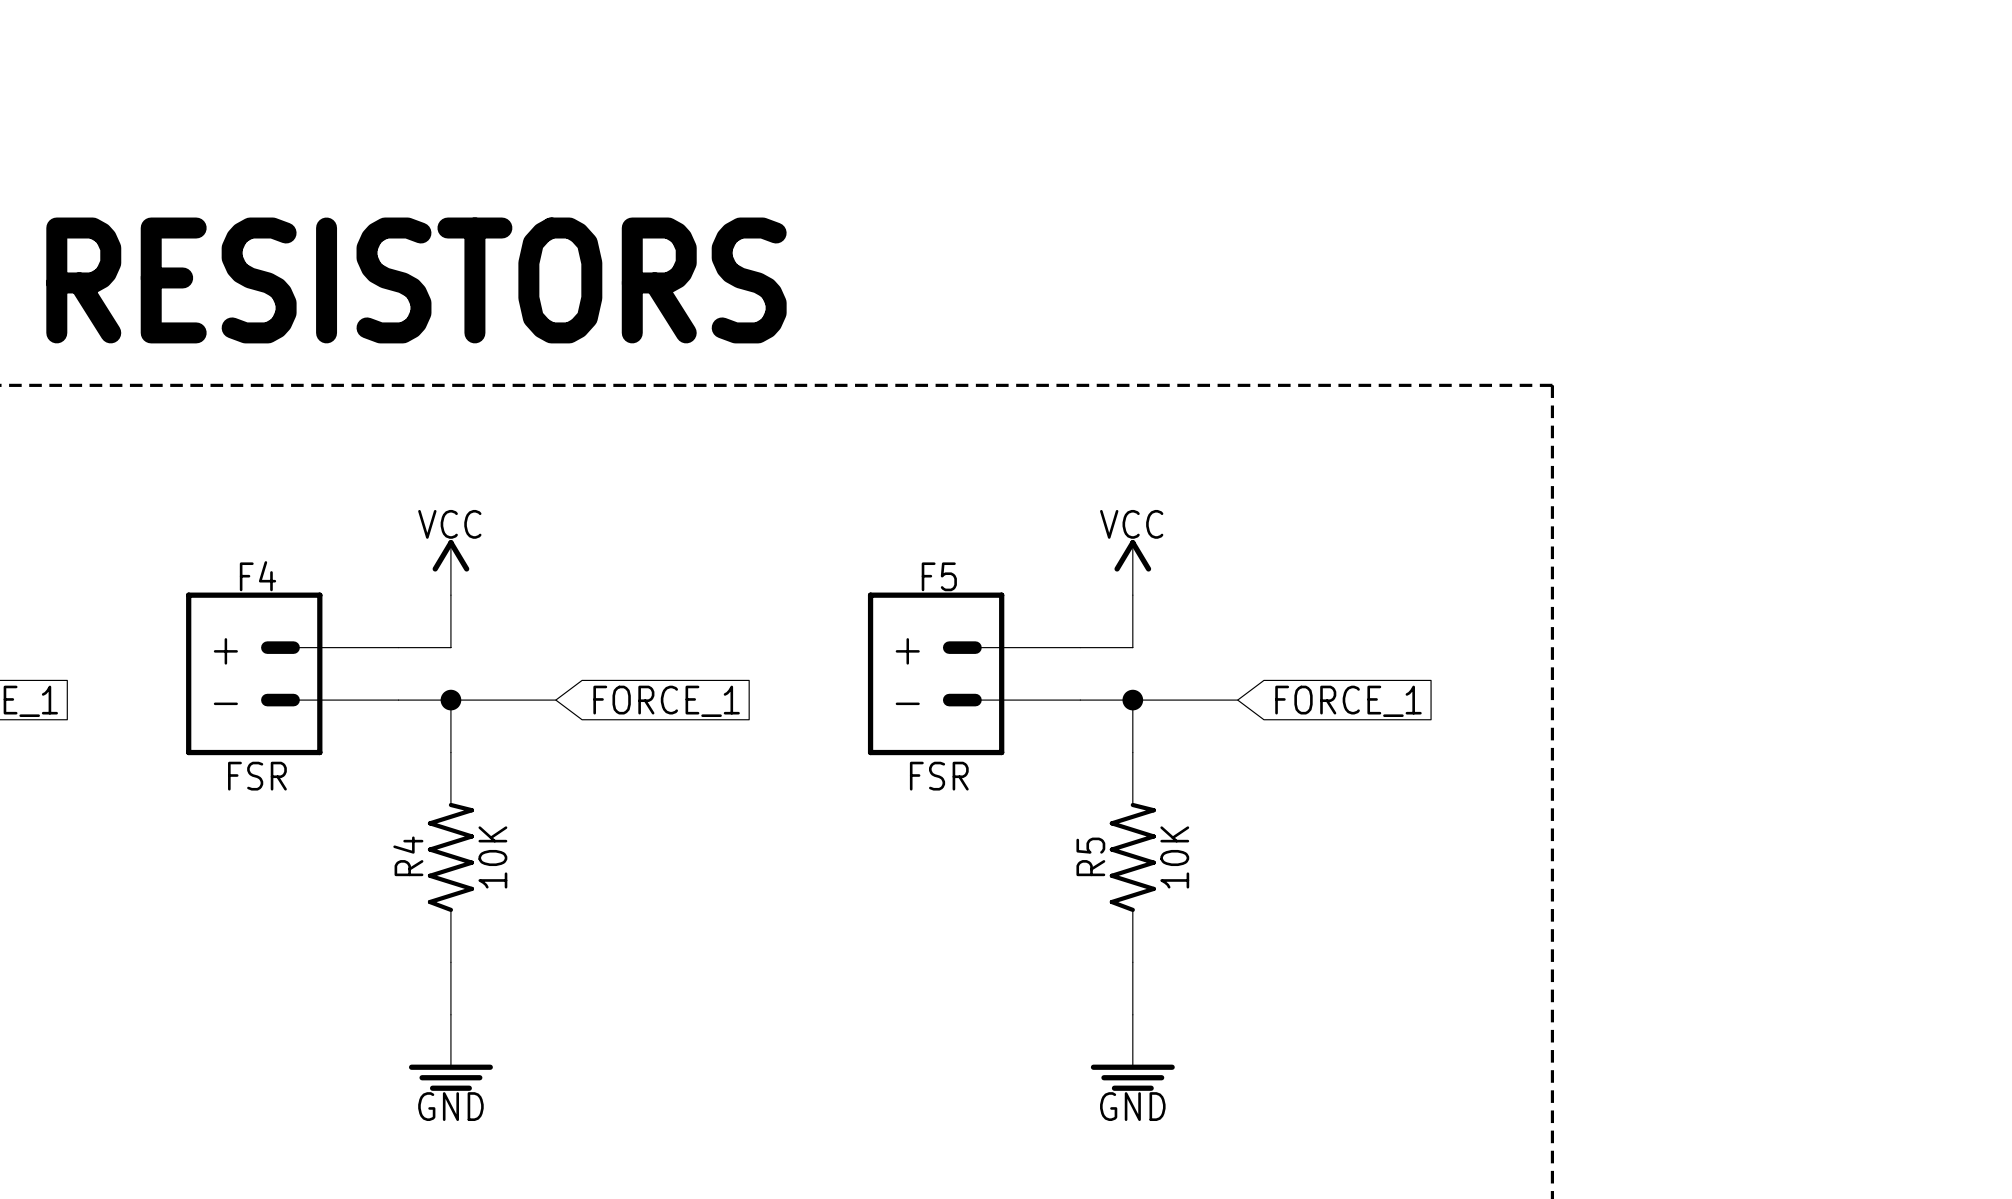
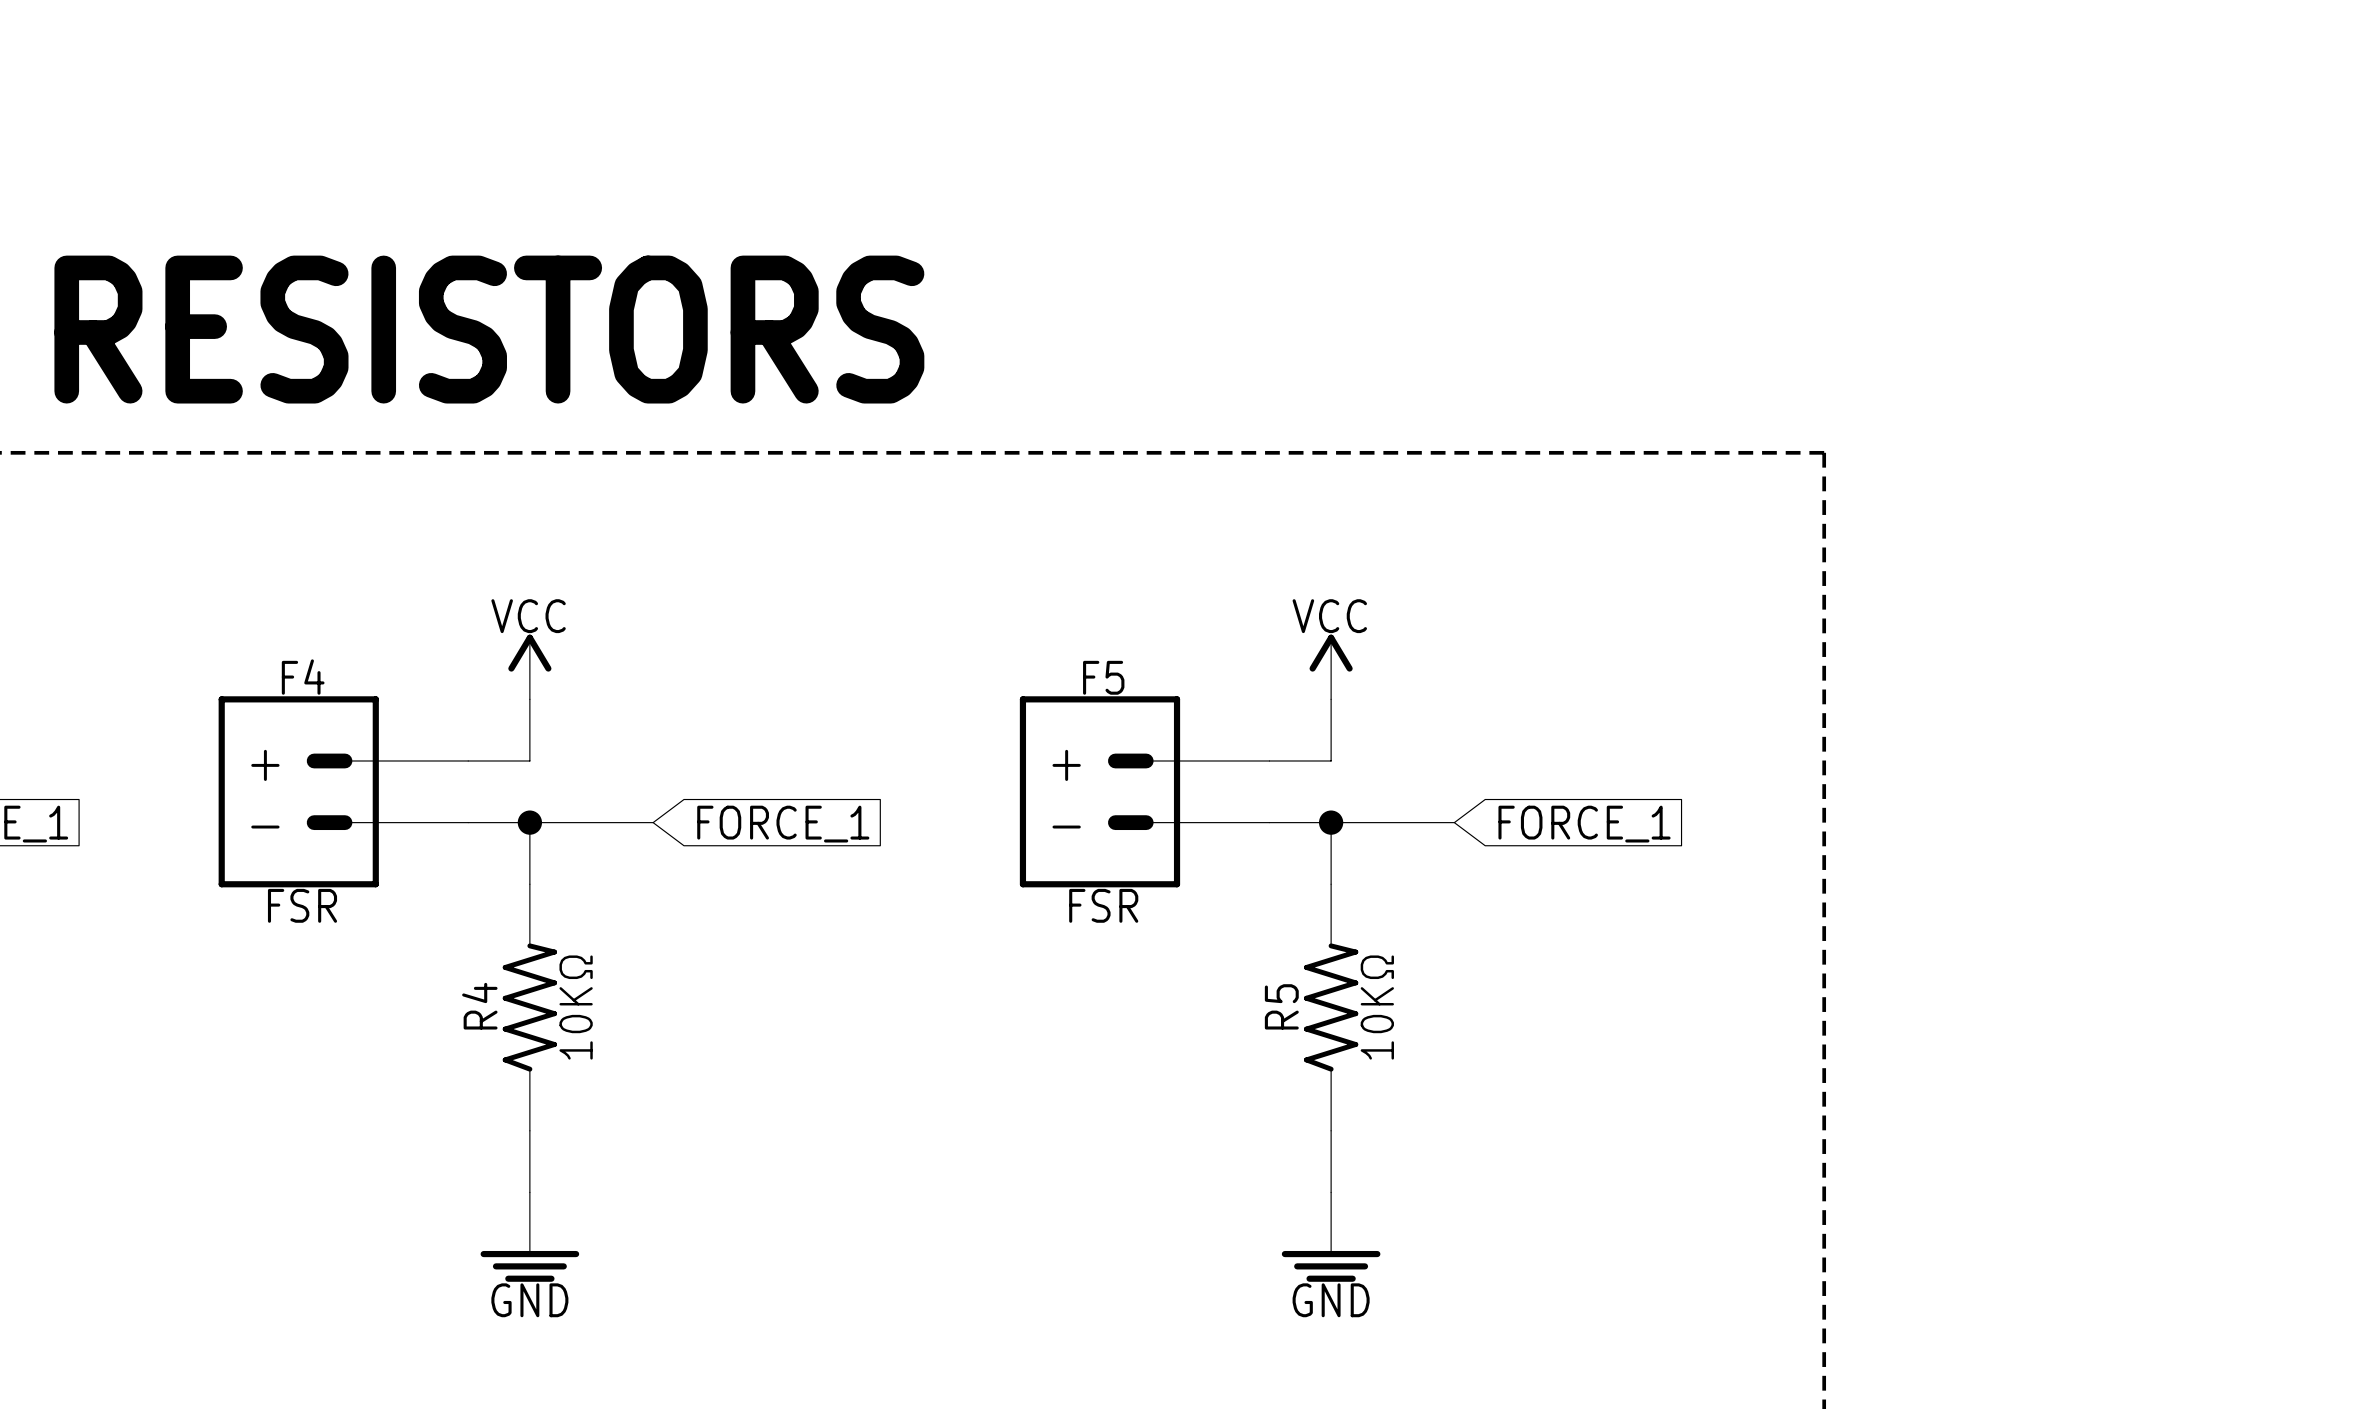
F4 value: none -> FSR (302, 905)
F5 value: none -> FSR (1103, 905)
F4 text: FSR (257, 776) -> none
F5 text: FSR (939, 776) -> none
R4 value: none -> 10KΩ (576, 1007)
R4 text: 10K (492, 857) -> none
R5 value: none -> 10KΩ (1377, 1007)
R5 text: 10K (1174, 857) -> none

